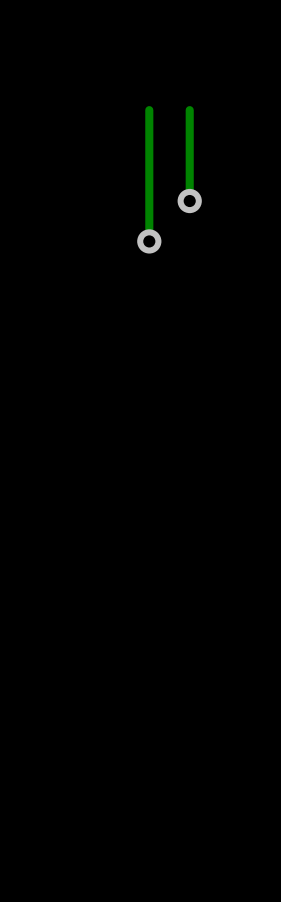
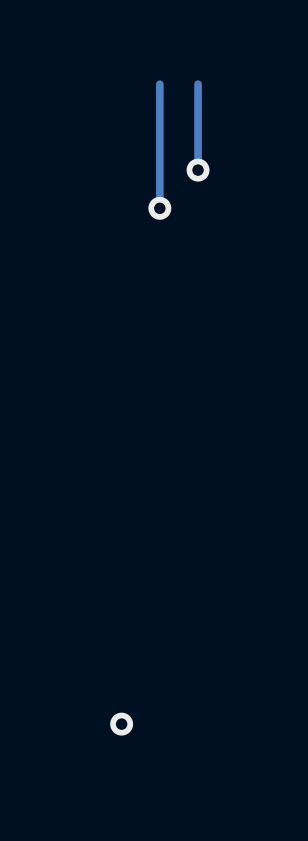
via: none -> (121, 724)

